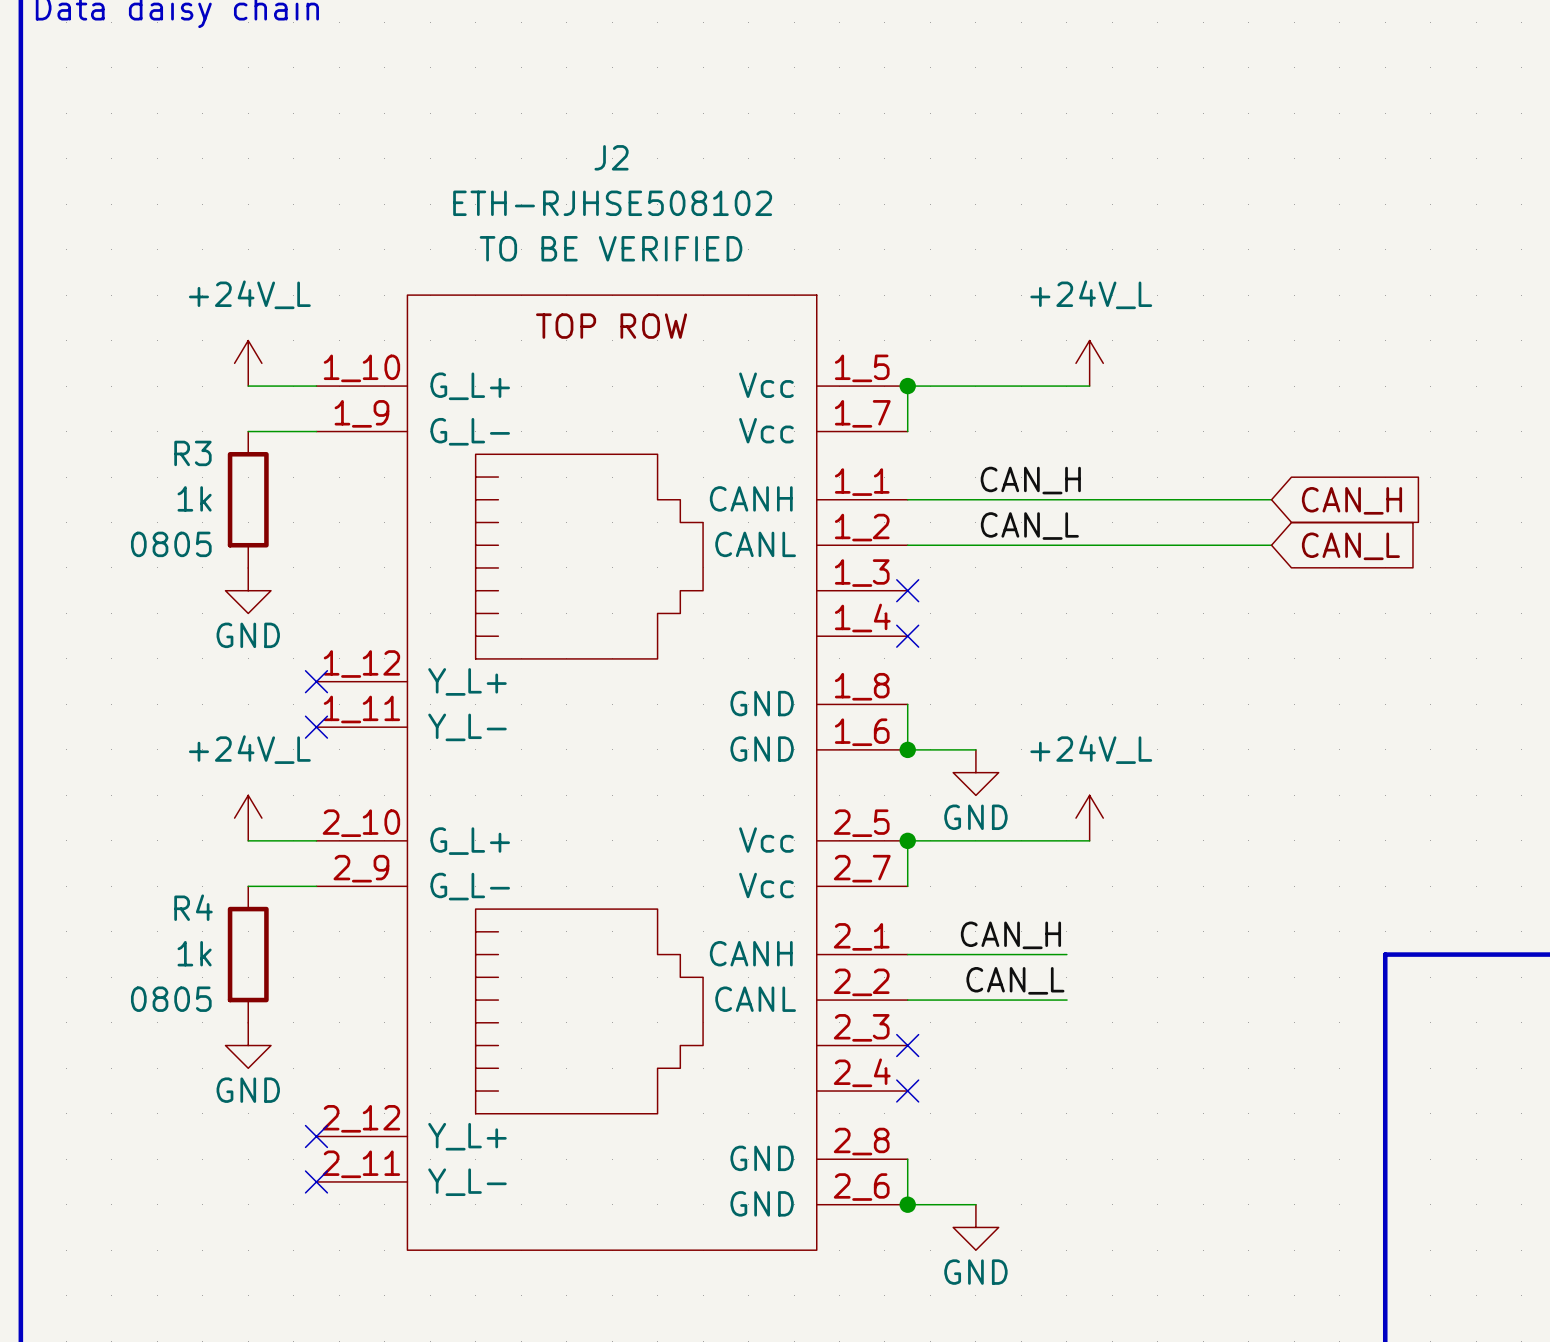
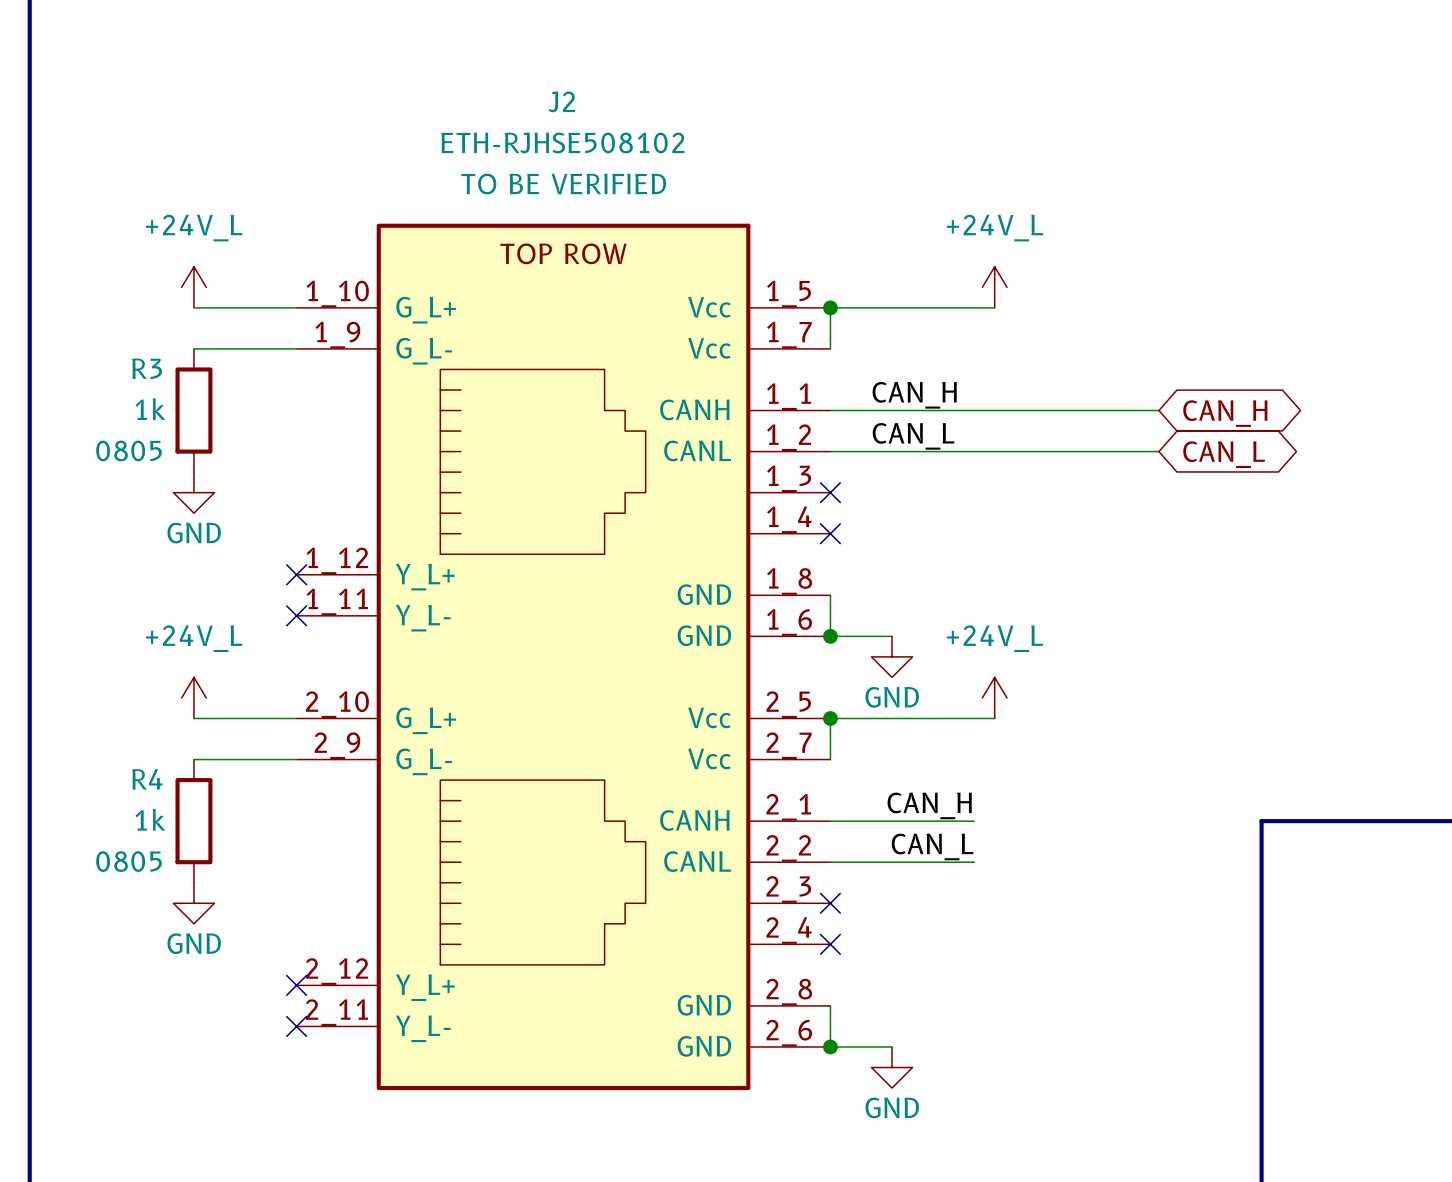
J2 symbol: [316, 295, 908, 1251] -> [296, 223, 831, 1091]
power symbol position: +24V_L (248, 363) -> +24V_L (193, 287)
wire: none -> (193, 307) (235, 307)
wire: none -> (193, 348) (235, 348)
label position: CAN_H (1030, 480) -> CAN_H (914, 395)
R3 position: (248, 499) -> (193, 410)
global label shape: input (1351, 500) -> bidirectional (1225, 413)
label position: CAN_L (1029, 526) -> CAN_L (913, 436)
global label shape: input (1350, 546) -> bidirectional (1224, 454)
power symbol position: GND (248, 590) -> GND (193, 492)
power symbol position: +24V_L (248, 818) -> +24V_L (193, 697)
wire: none -> (193, 718) (235, 718)
wire: none -> (193, 759) (235, 759)
R4 position: (248, 954) -> (193, 821)
power symbol position: GND (248, 1045) -> GND (193, 903)

